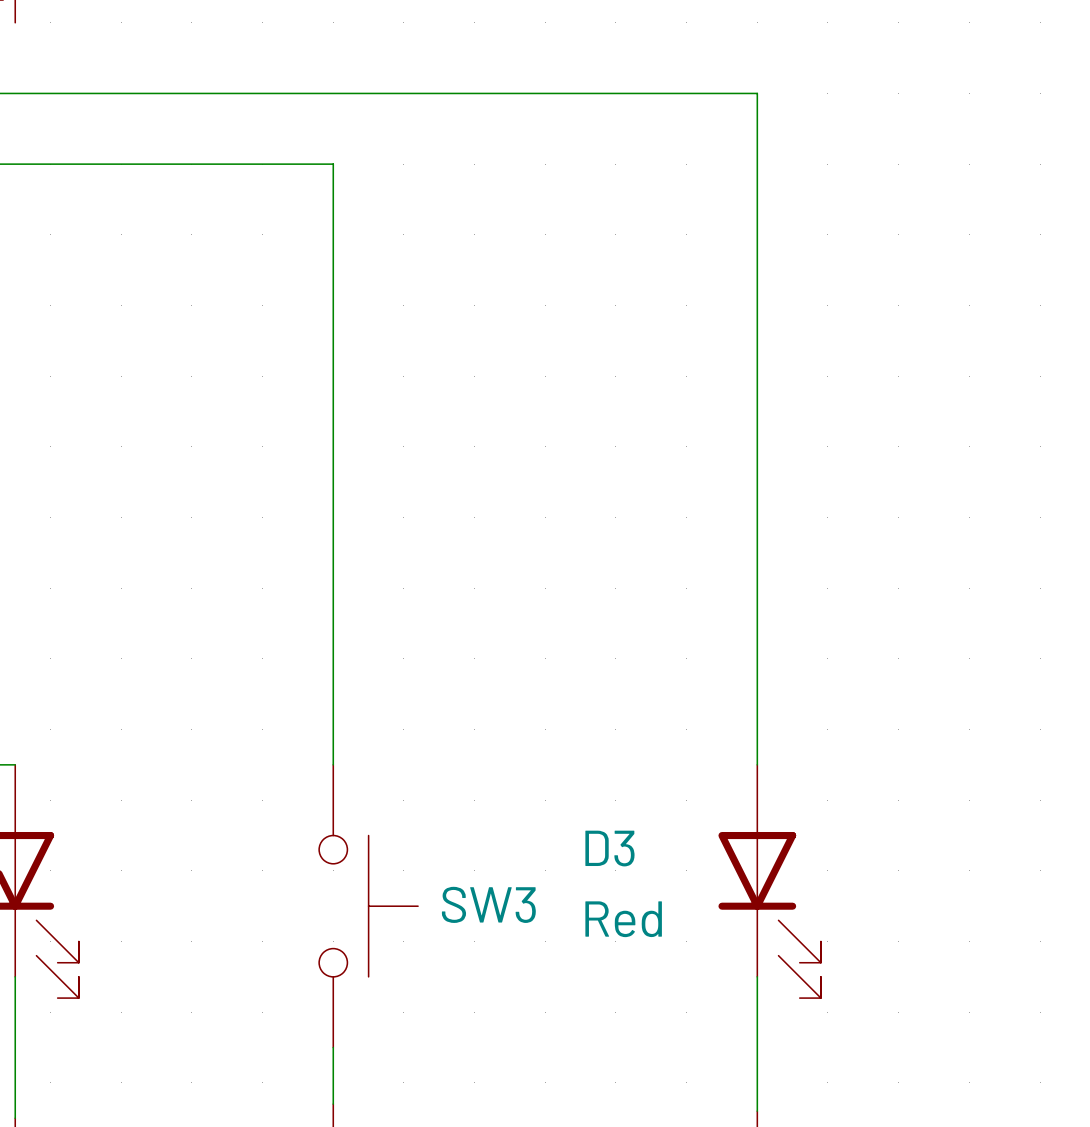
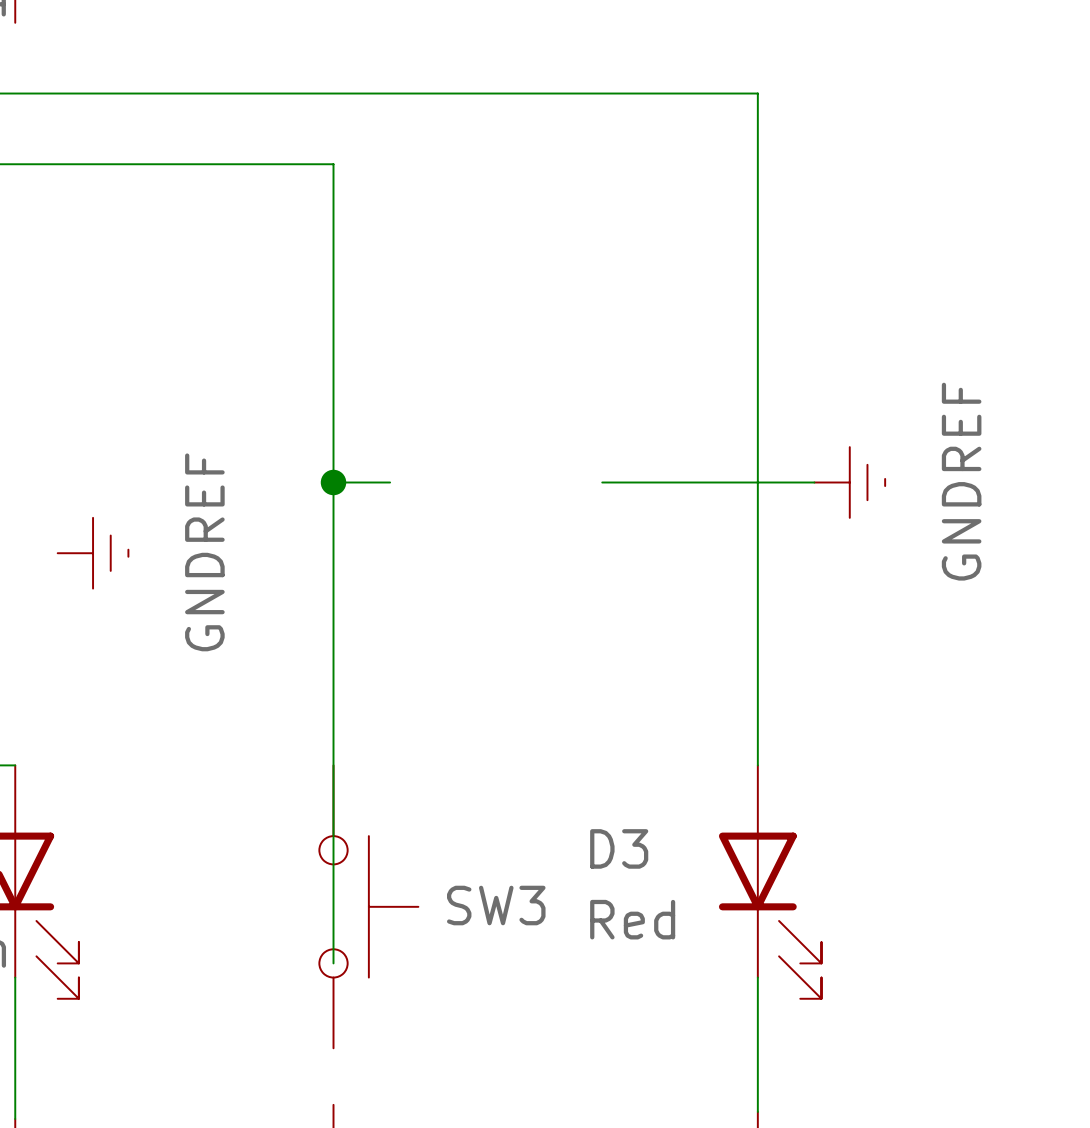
wire: none -> (333, 482) (390, 482)
junction: none -> (333, 482)
wire: none -> (602, 482) (814, 482)
power symbol: none -> GNDREF (849, 482)
power symbol: none -> GNDREF (93, 553)
wire: none -> (333, 765) (333, 963)
wire: (333, 1047) (333, 1104) -> none

